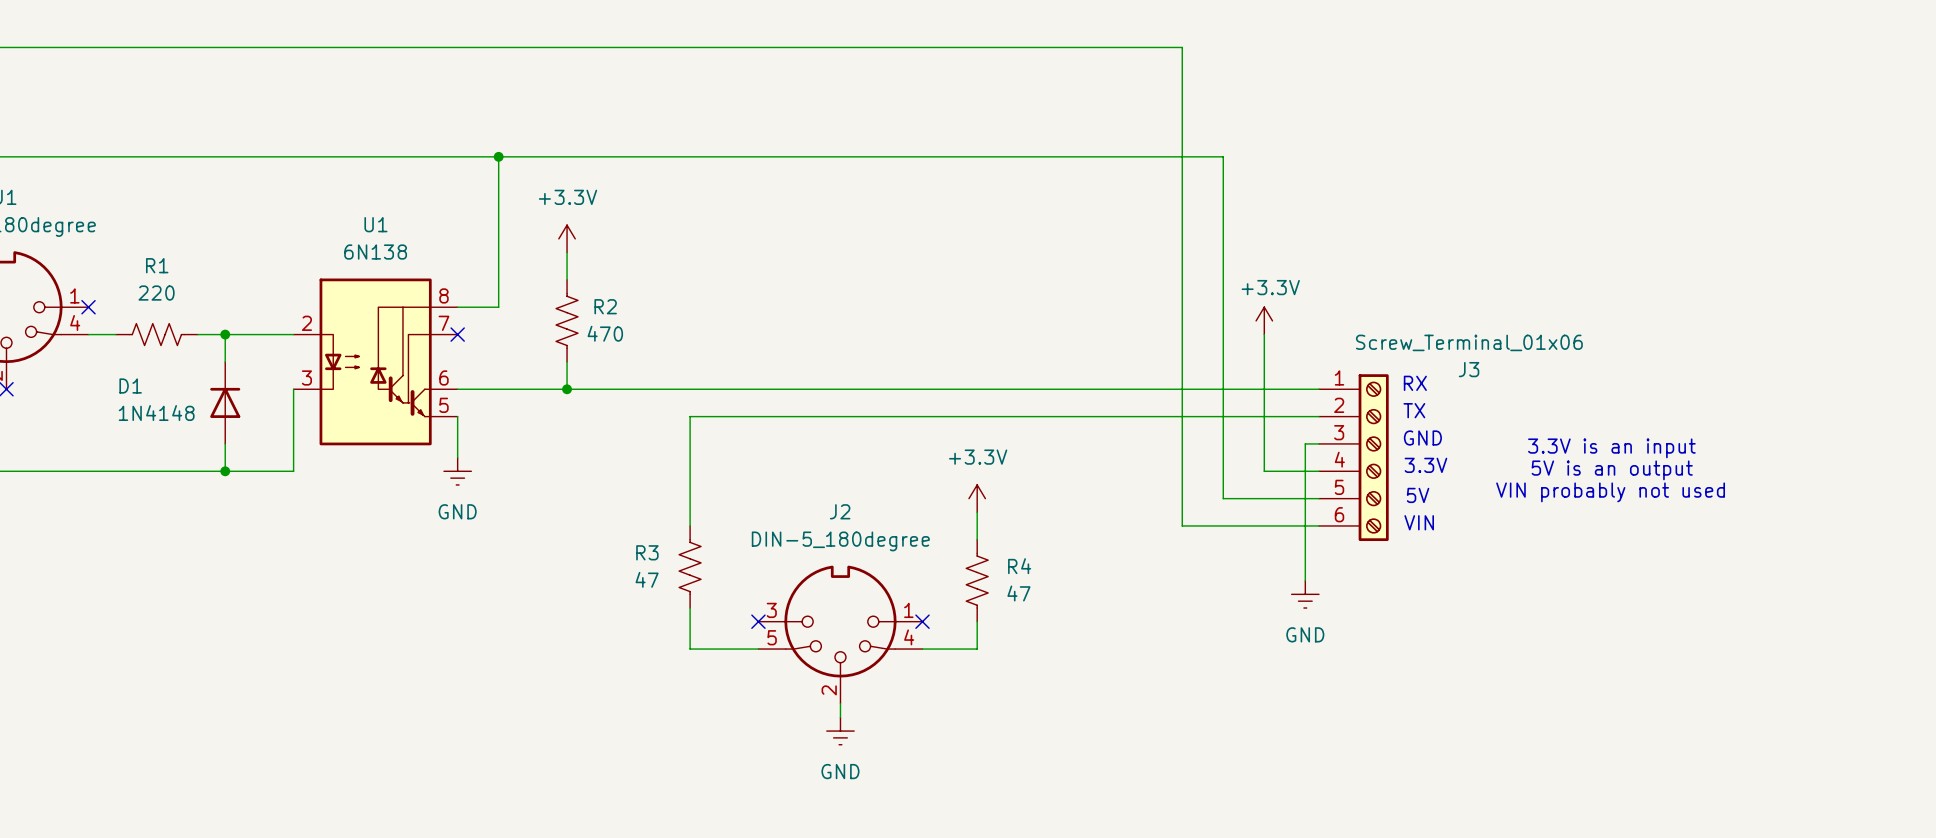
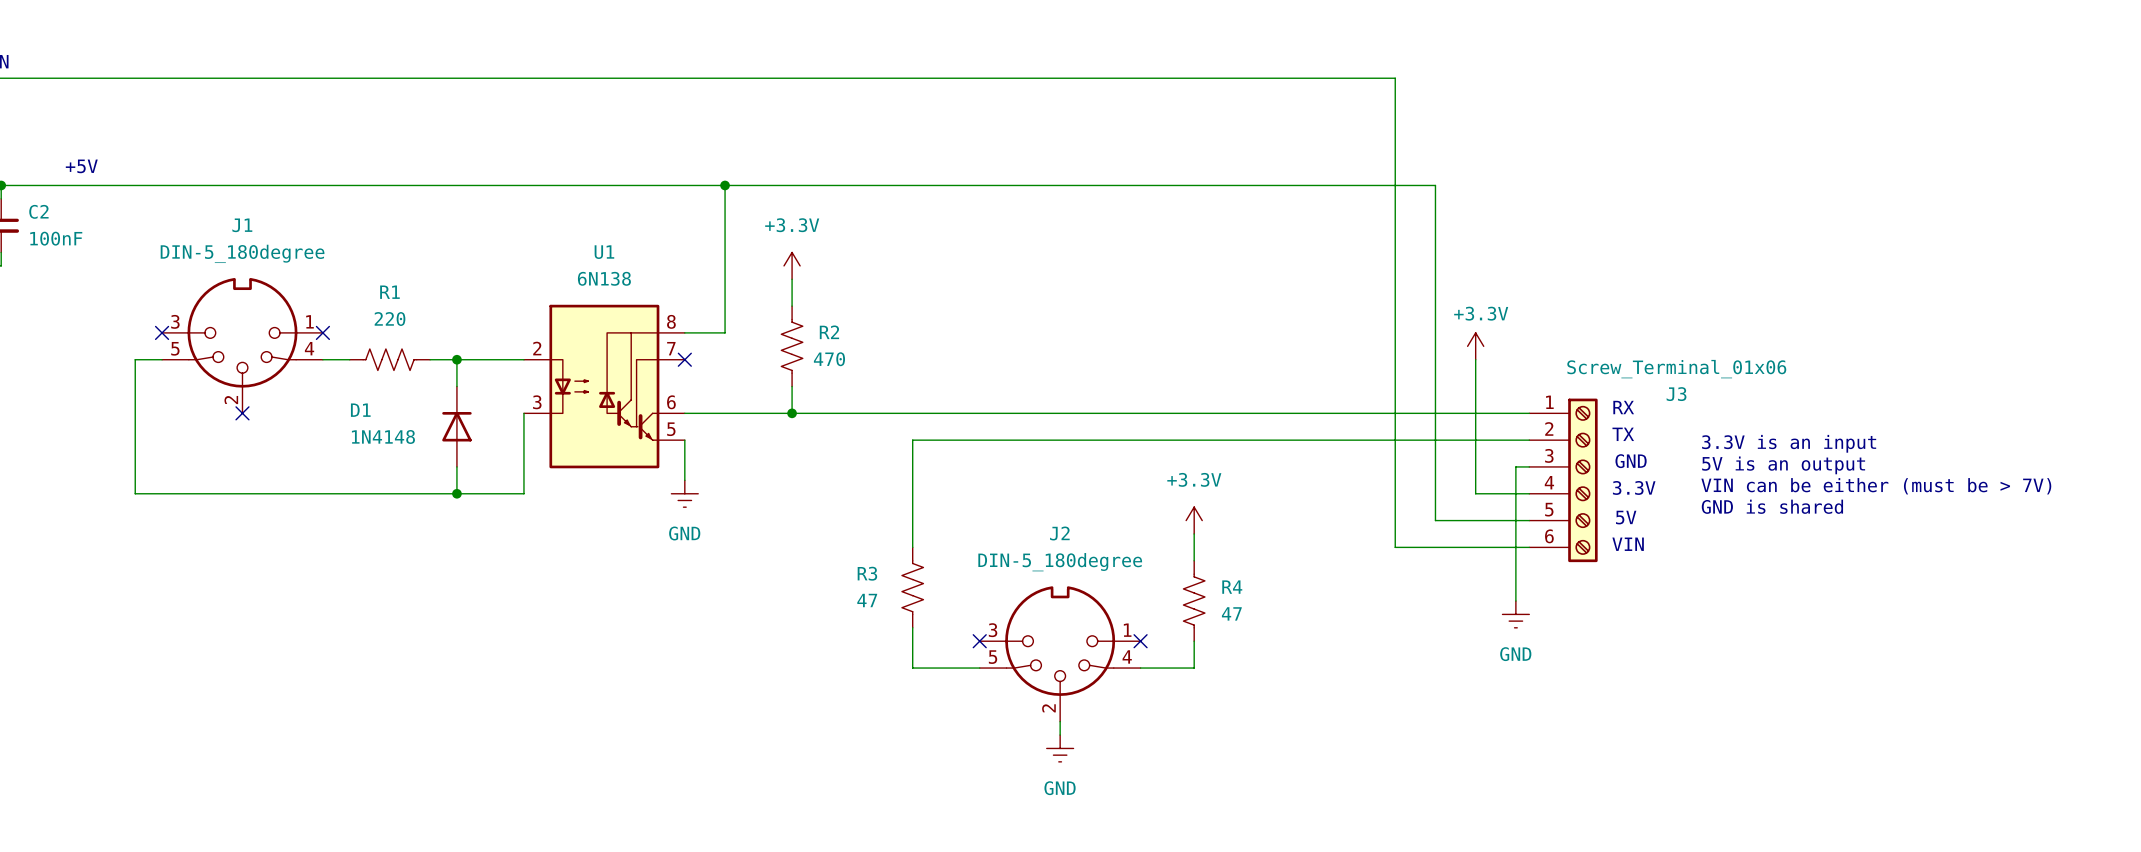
text position: 3.3V is an input (1611, 448) -> 3.3V is an input (1789, 443)
text: none -> VIN can be either (must be > 7V) (1876, 486)
text position: 5V is an output (1612, 470) -> 5V is an output (1783, 465)
text: none -> GND is shared (1772, 506)
text: VIN probably not used (1610, 492) -> none

